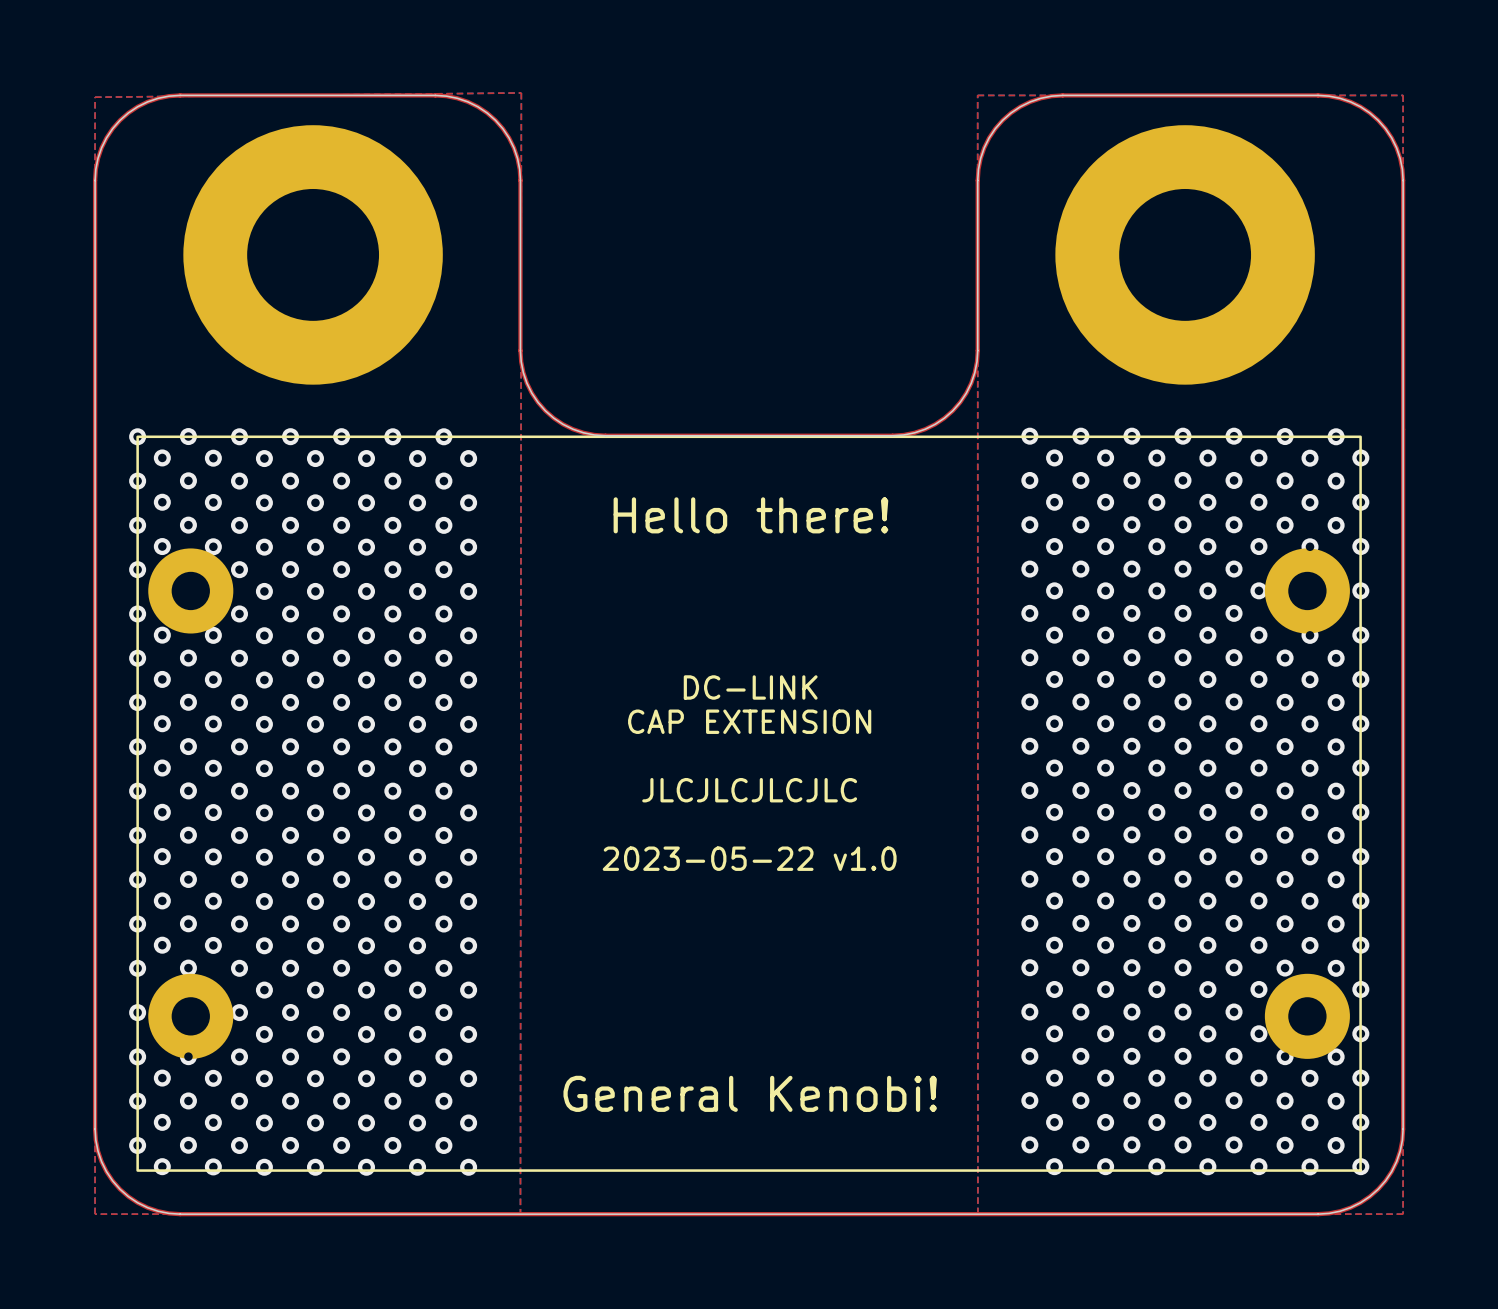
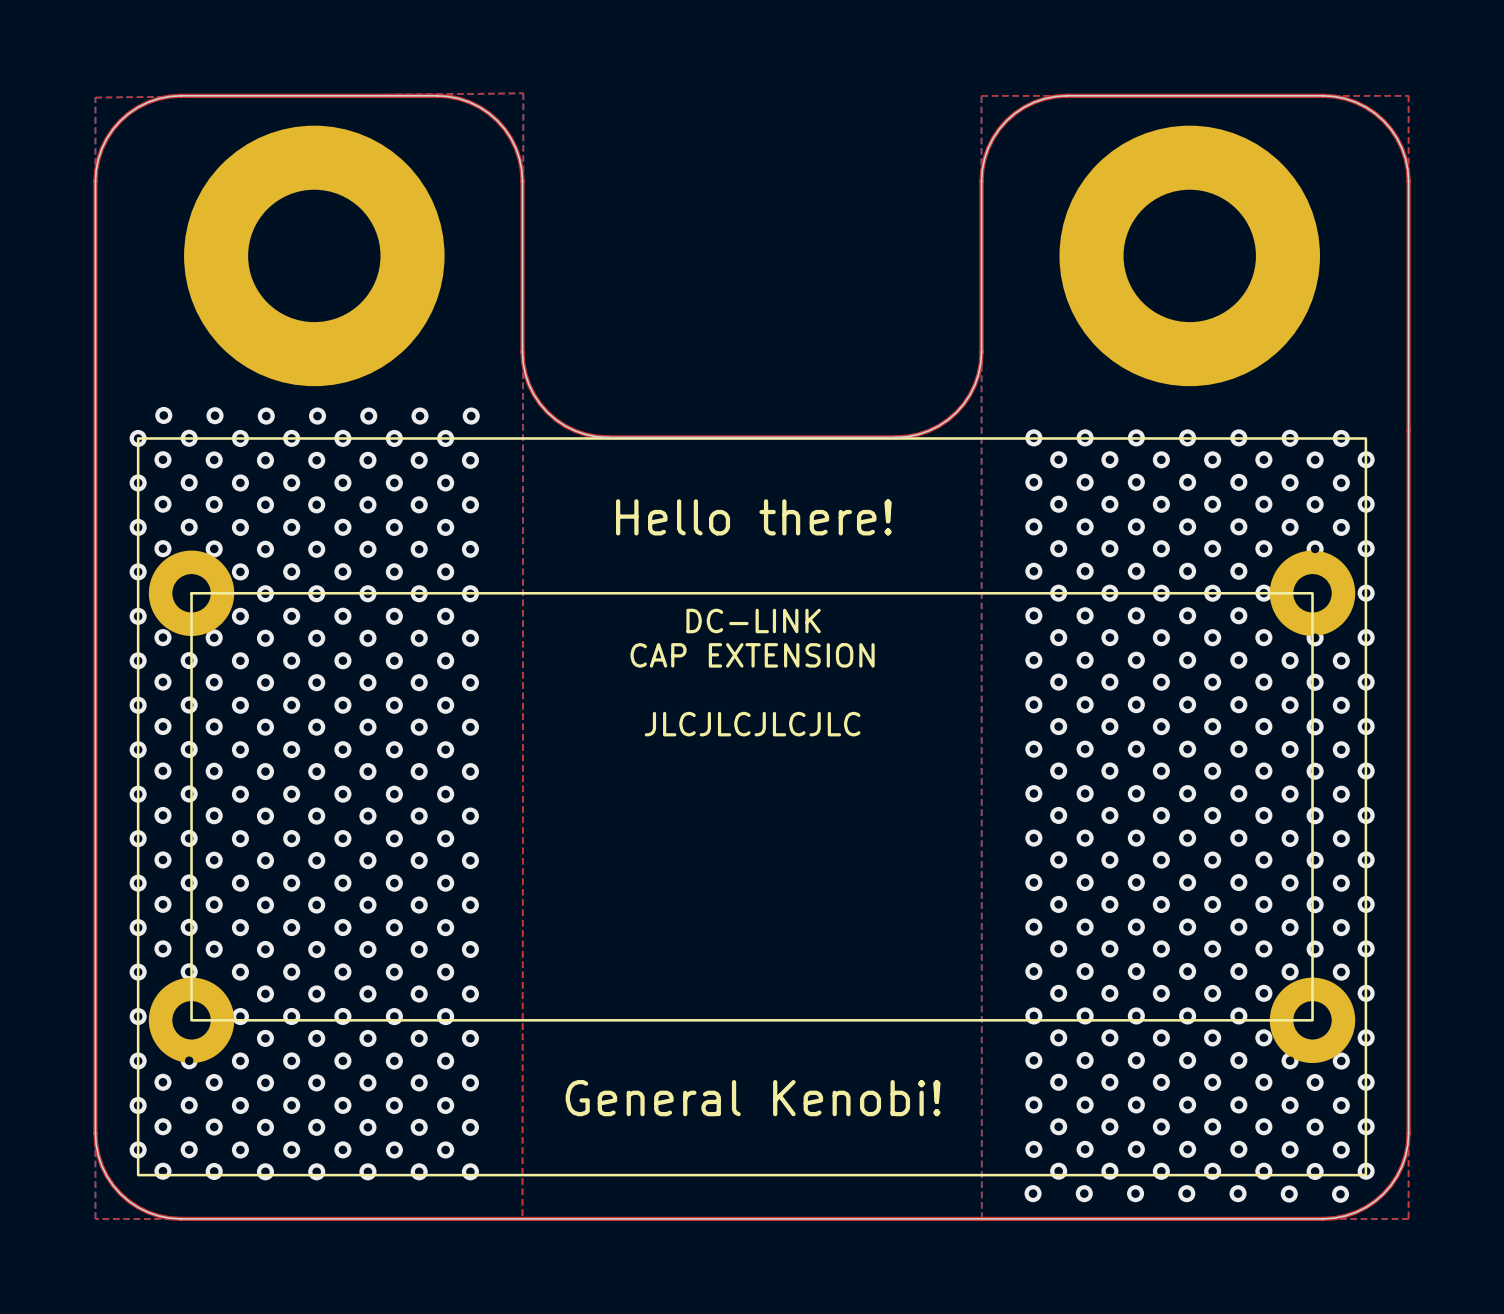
via: none -> (163, 415)
via: none -> (215, 415)
via: none -> (266, 416)
via: none -> (317, 416)
via: none -> (368, 416)
via: none -> (420, 416)
via: none -> (471, 416)
part footprint: [136, 435, 1362, 1172] -> [136, 437, 1368, 1177]
text: none -> CAP EXTENSION (752, 655)
text position: DC-LINK (750, 687) -> DC-LINK (753, 620)
text: CAP EXTENSION (749, 721) -> JLCJLCJLCJLC (752, 724)
text: JLCJLCJLCJLC (749, 790) -> none
text: 2023-05-22 v1.0 (749, 858) -> none
via: none -> (1033, 1193)
via: none -> (1084, 1193)
via: none -> (1135, 1193)
via: none -> (1186, 1193)
via: none -> (1238, 1193)
via: none -> (1289, 1194)
via: none -> (1340, 1194)

